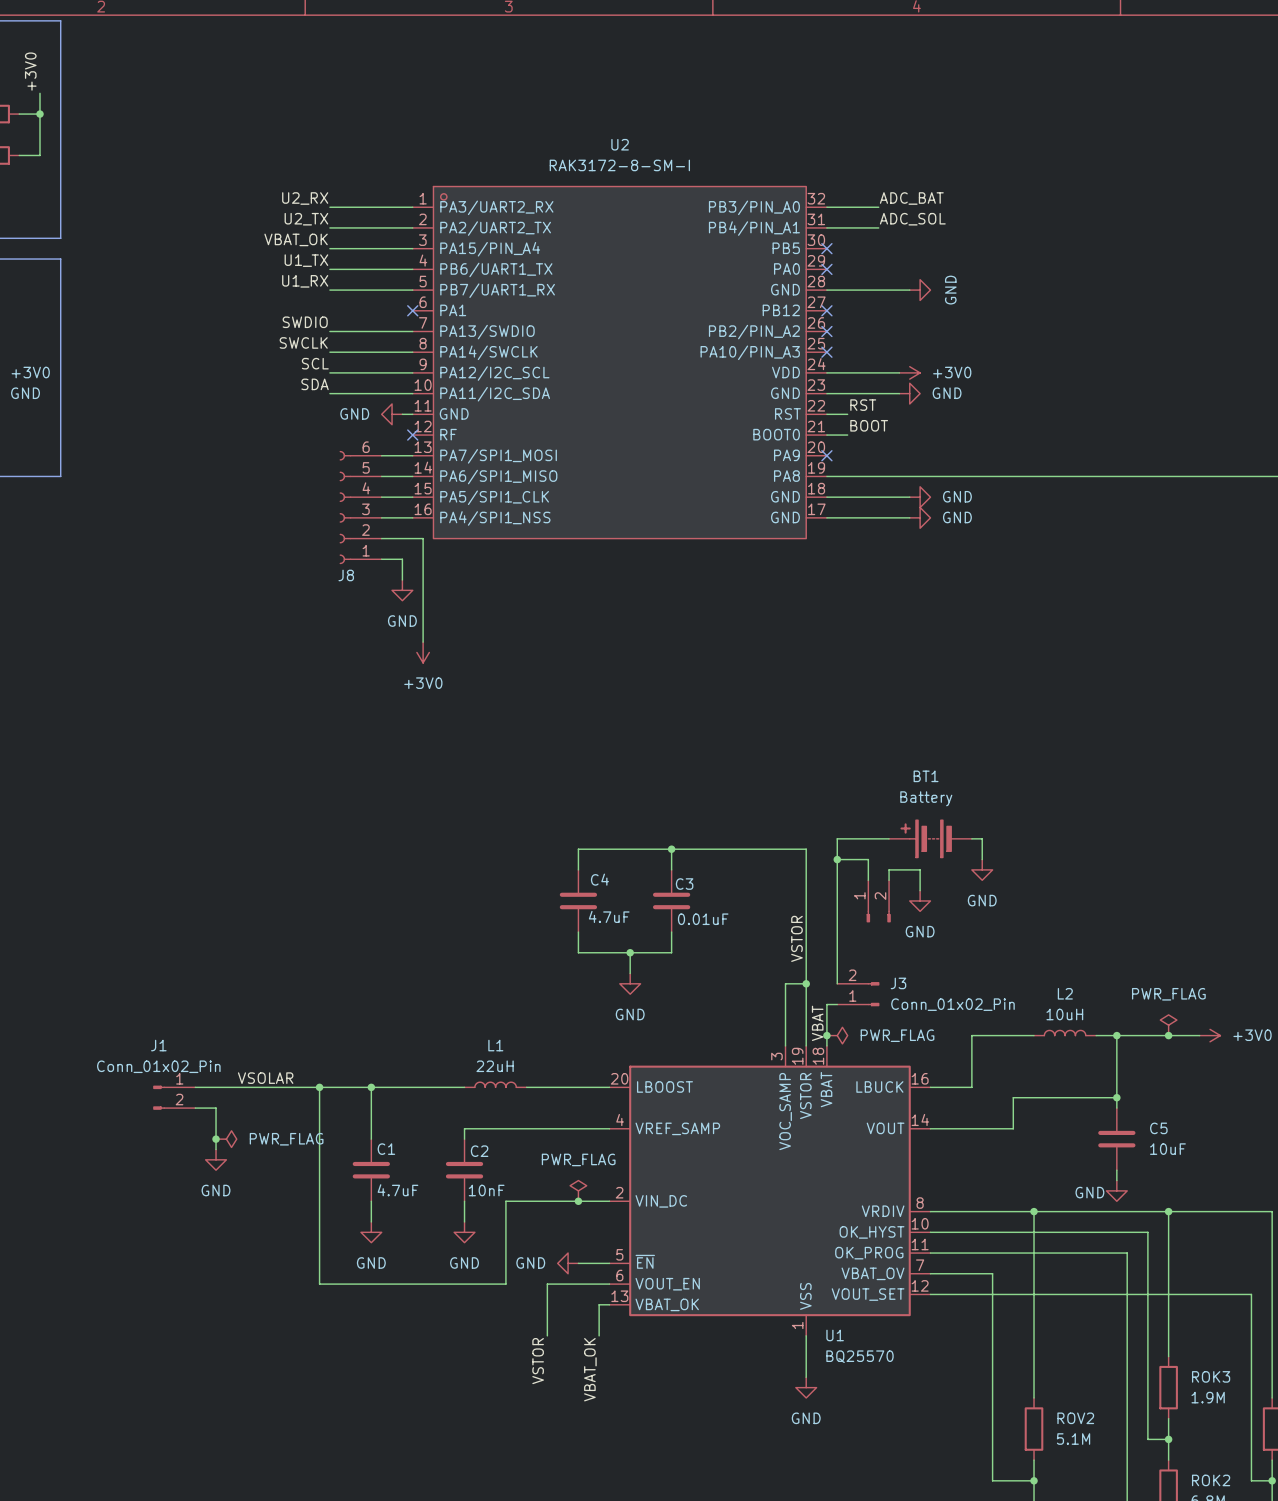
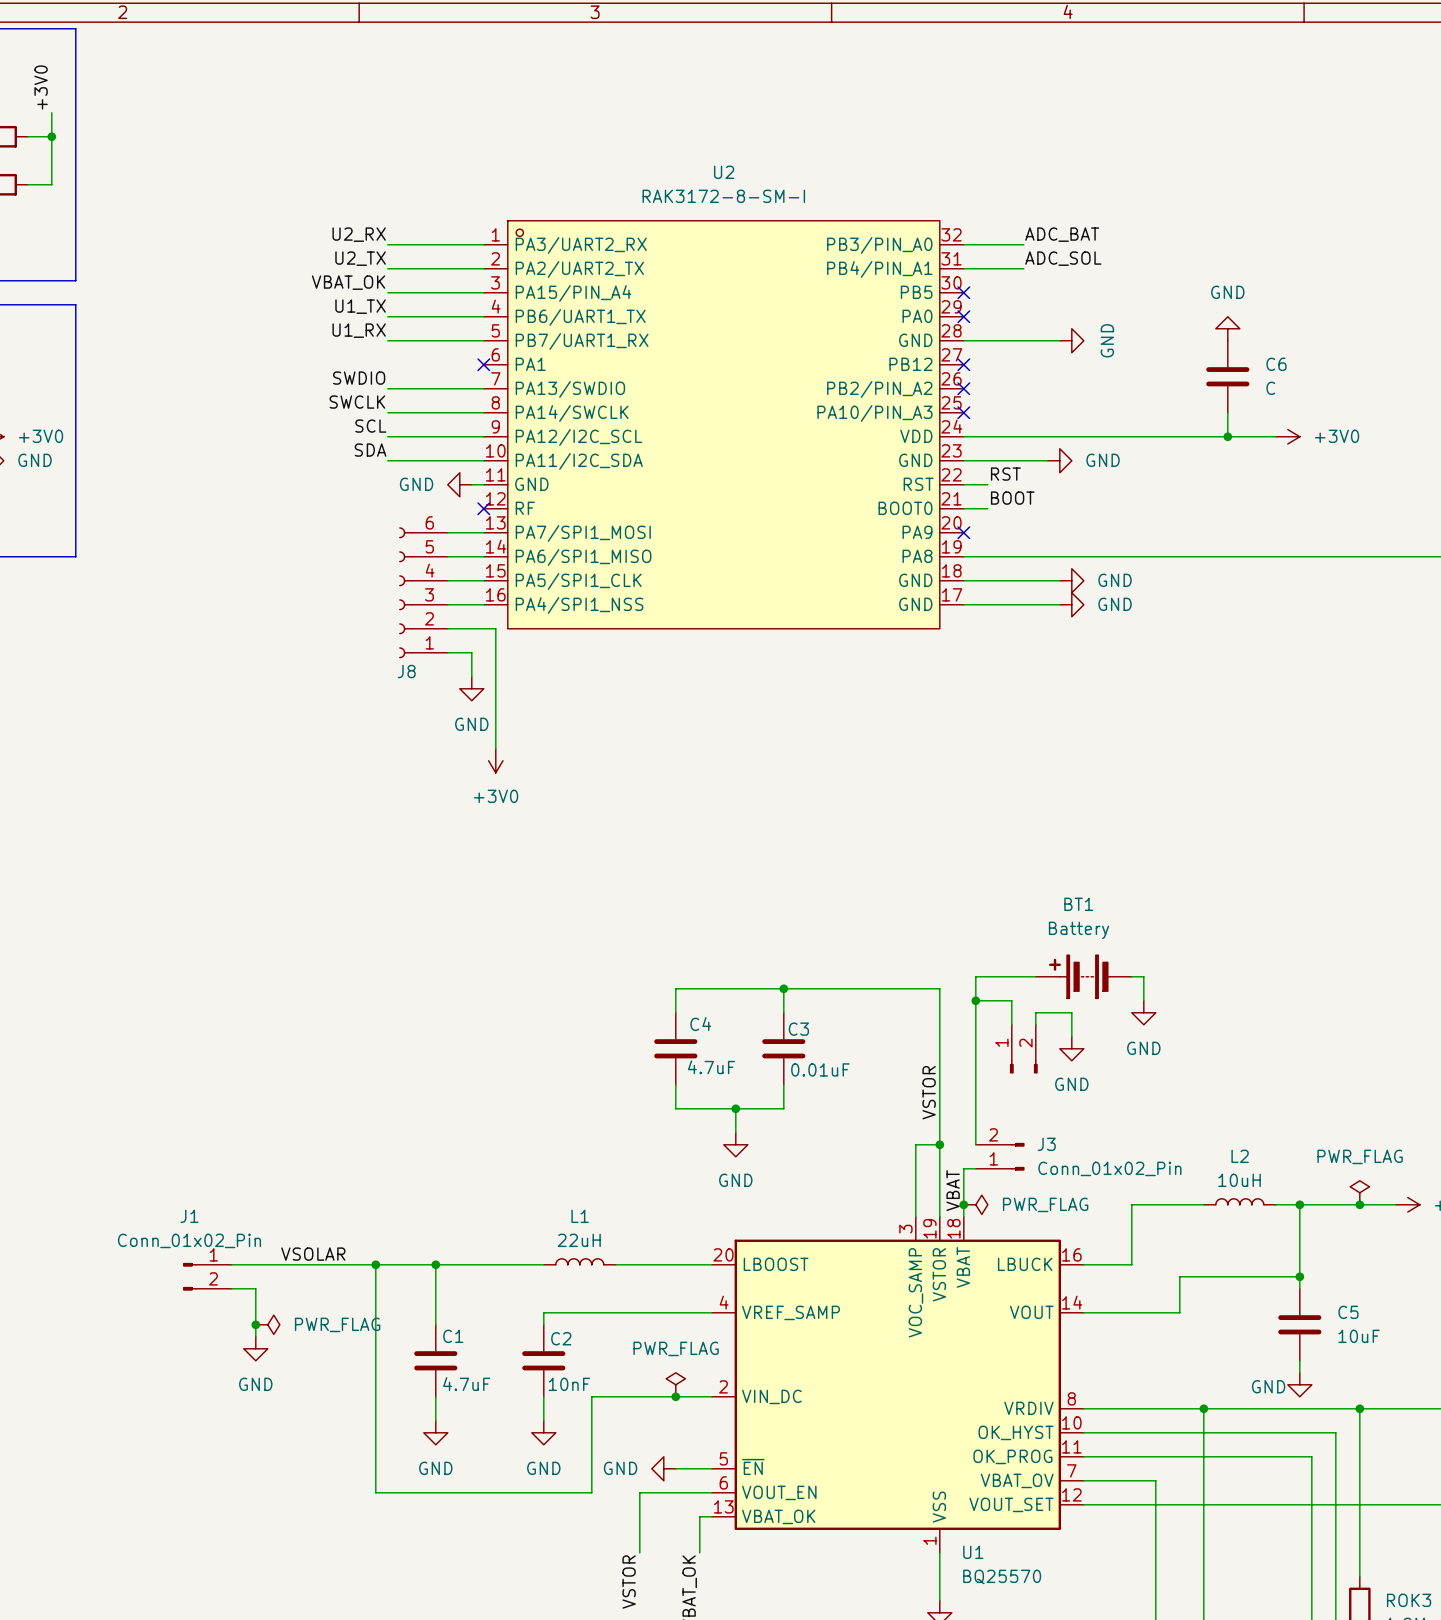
power symbol: none -> GND (1227, 328)
C6: none -> C (1227, 376)
wire: none -> (1227, 412) (1227, 436)
wire: none -> (1047, 436) (1275, 436)
power symbol position: +3V0 (909, 372) -> +3V0 (1287, 436)
junction: none -> (1227, 436)

